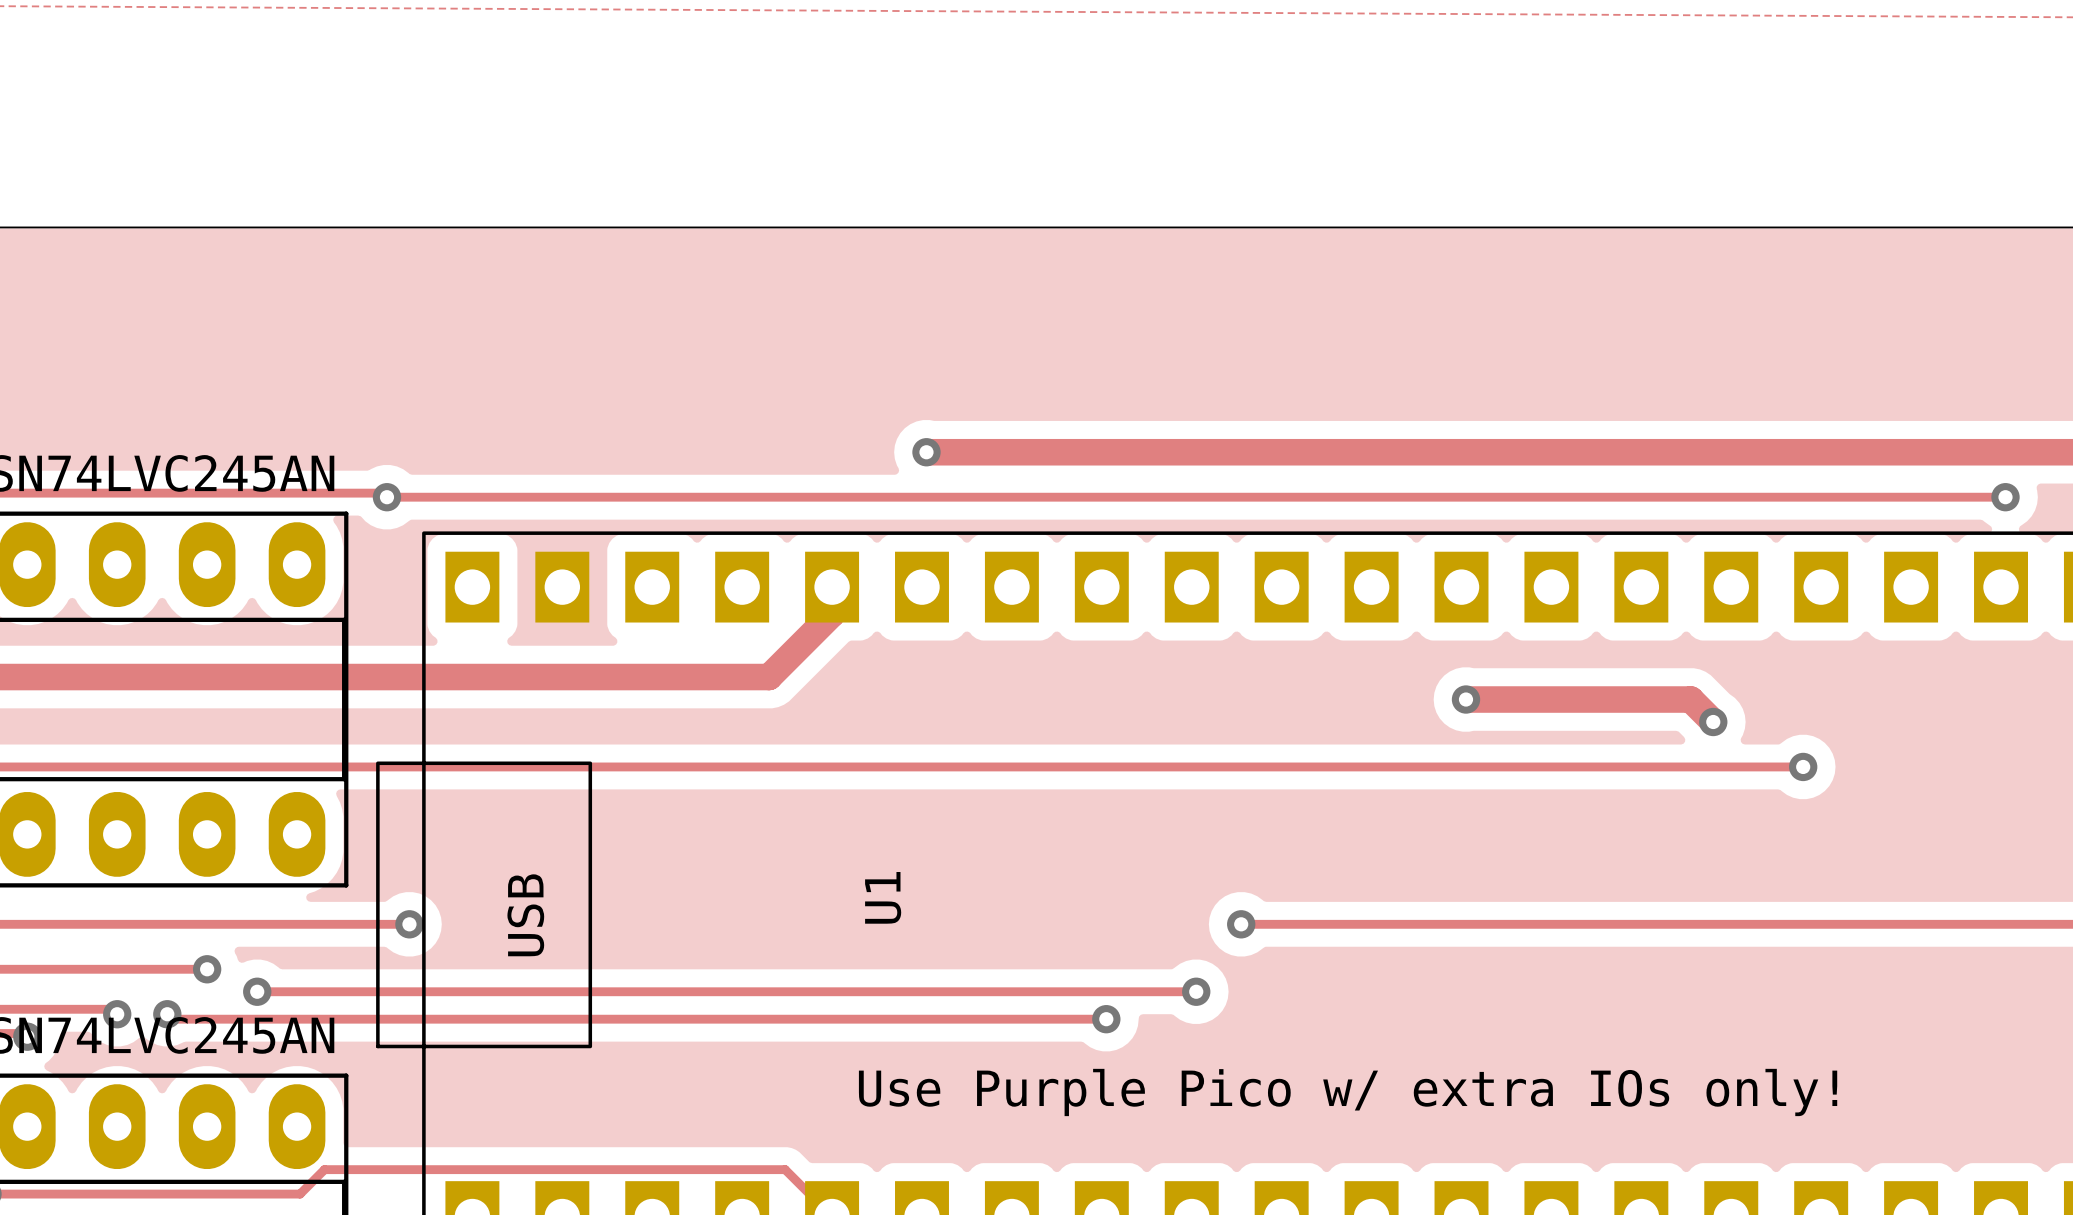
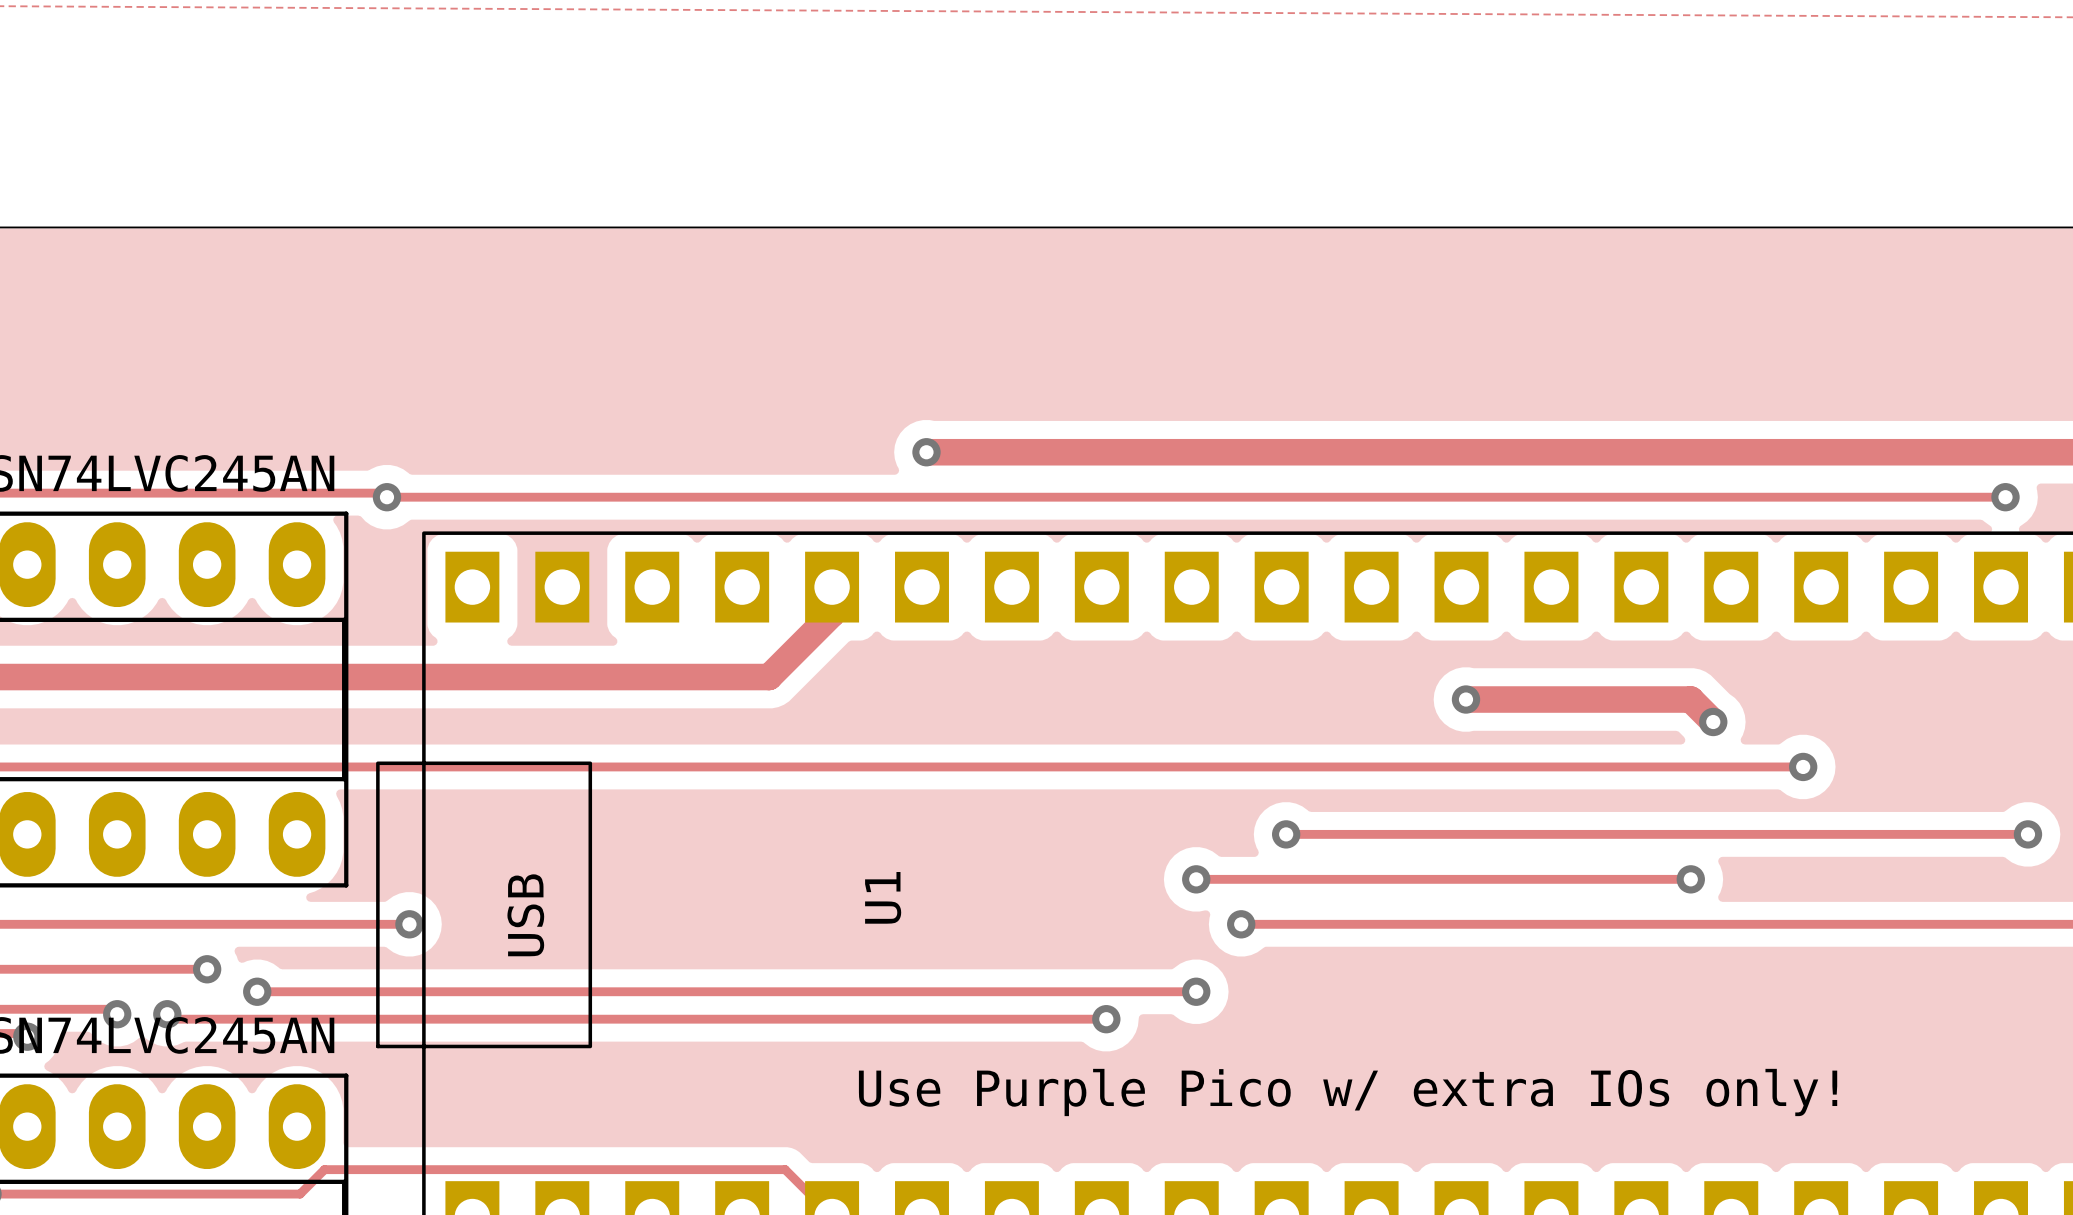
track: none -> (1286, 834) (2027, 834)
via: none -> (1286, 834)
via: none -> (2027, 834)
track: none -> (1196, 879) (1690, 879)
via: none -> (1196, 879)
via: none -> (1690, 879)

